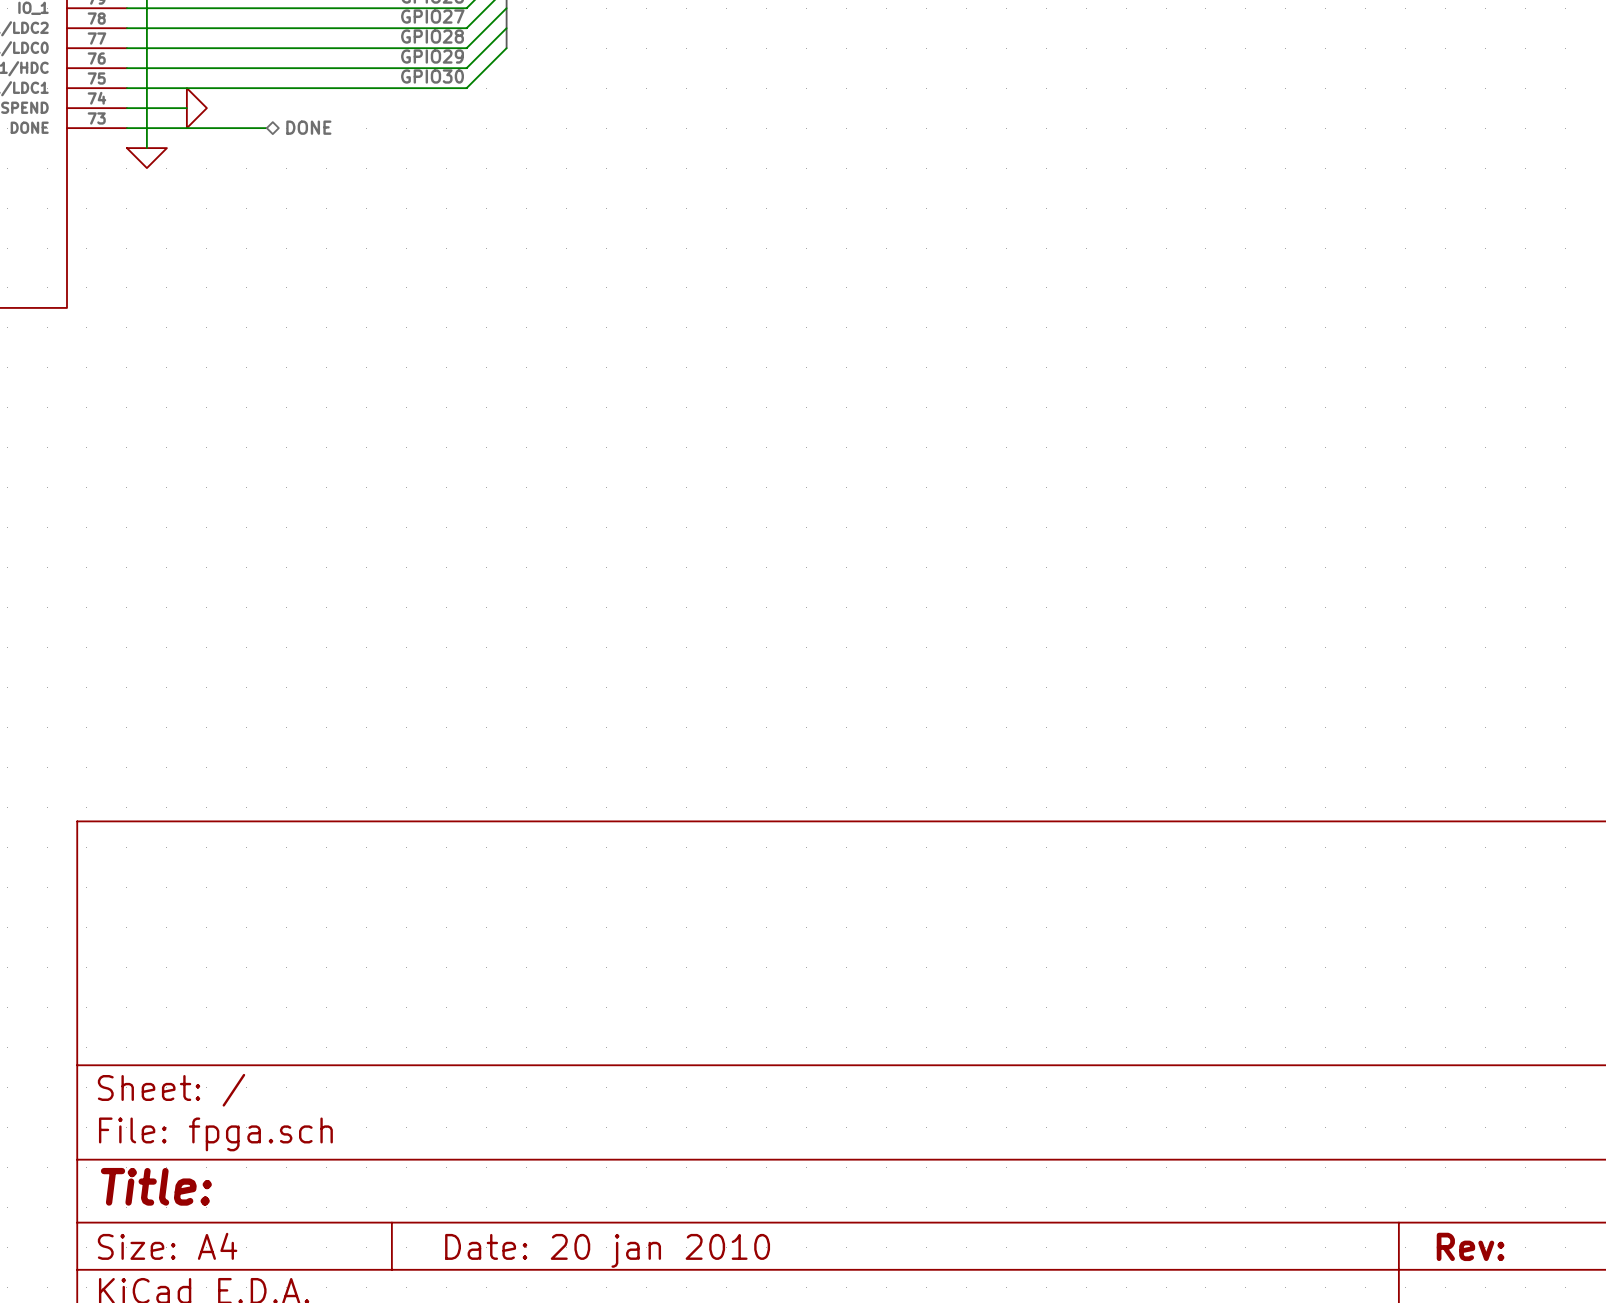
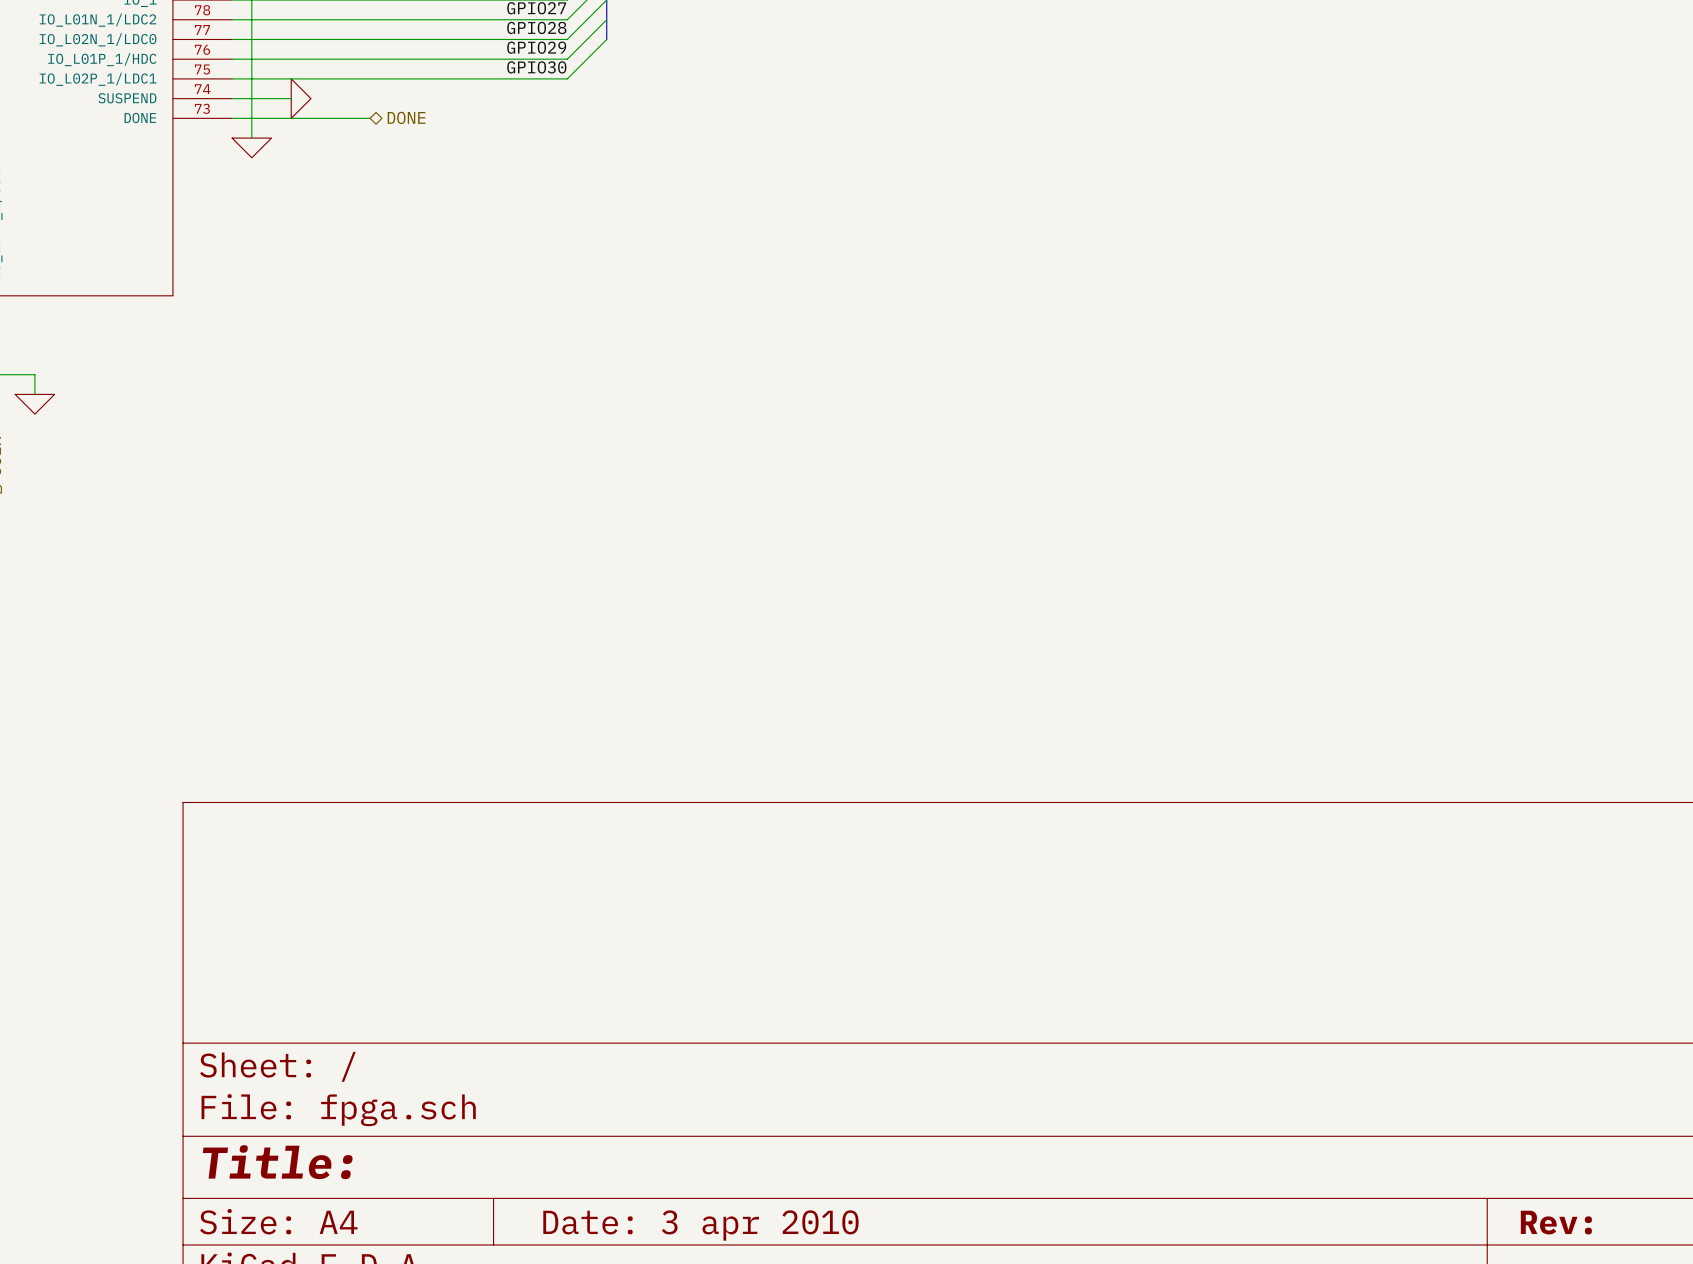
title block: Date: 20 jan 2010 (607, 1250) -> Date: 3 apr 2010 (700, 1225)

